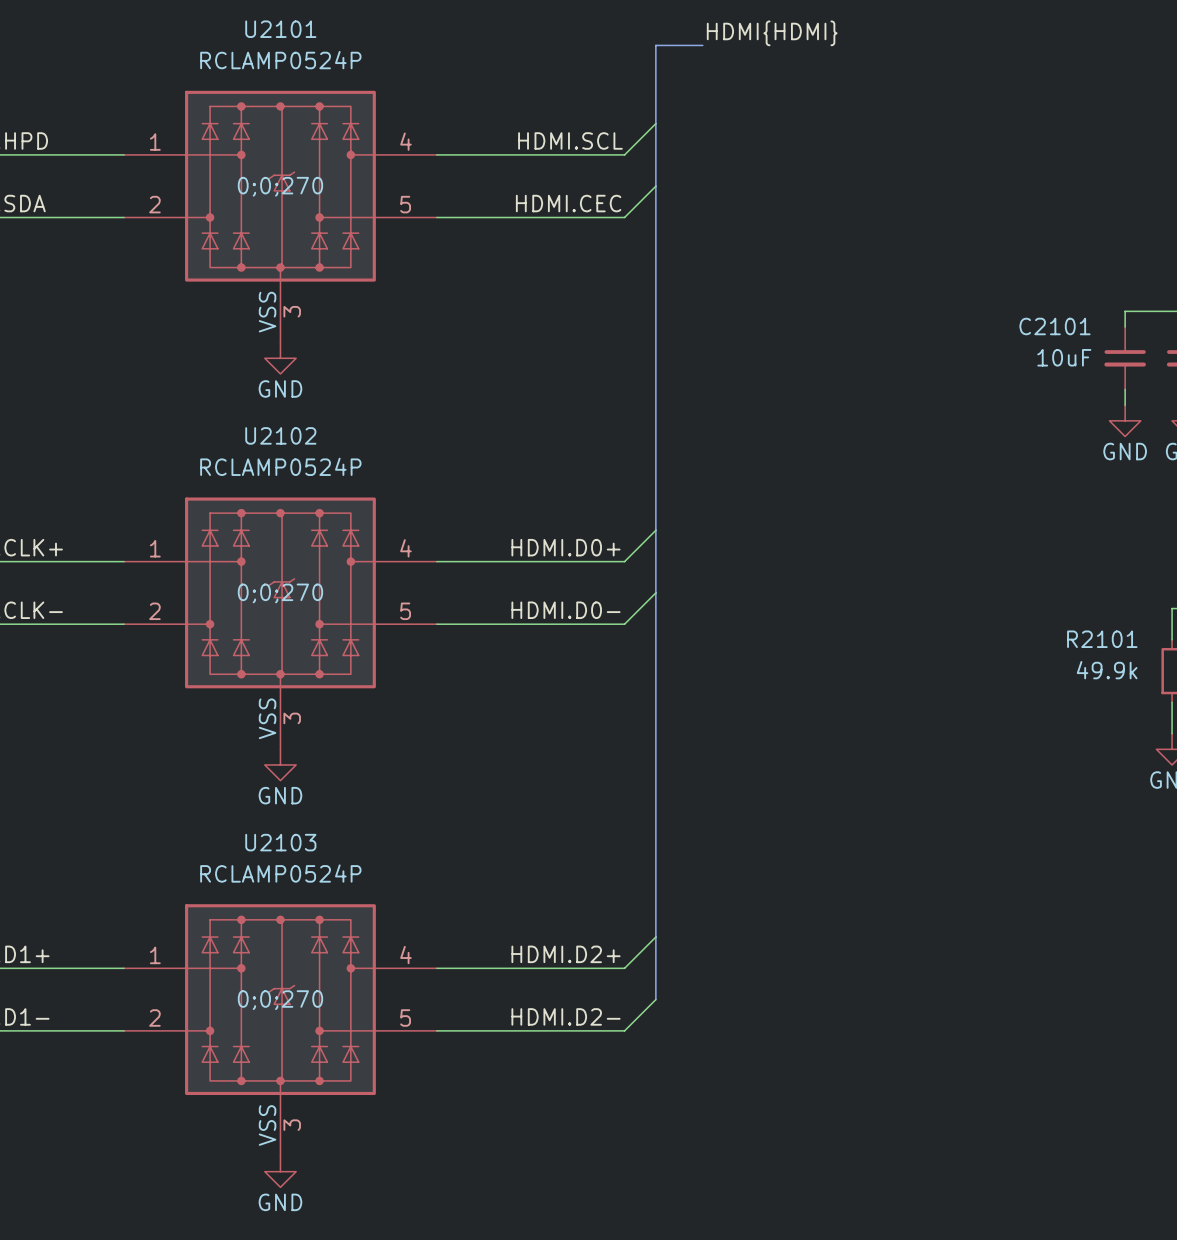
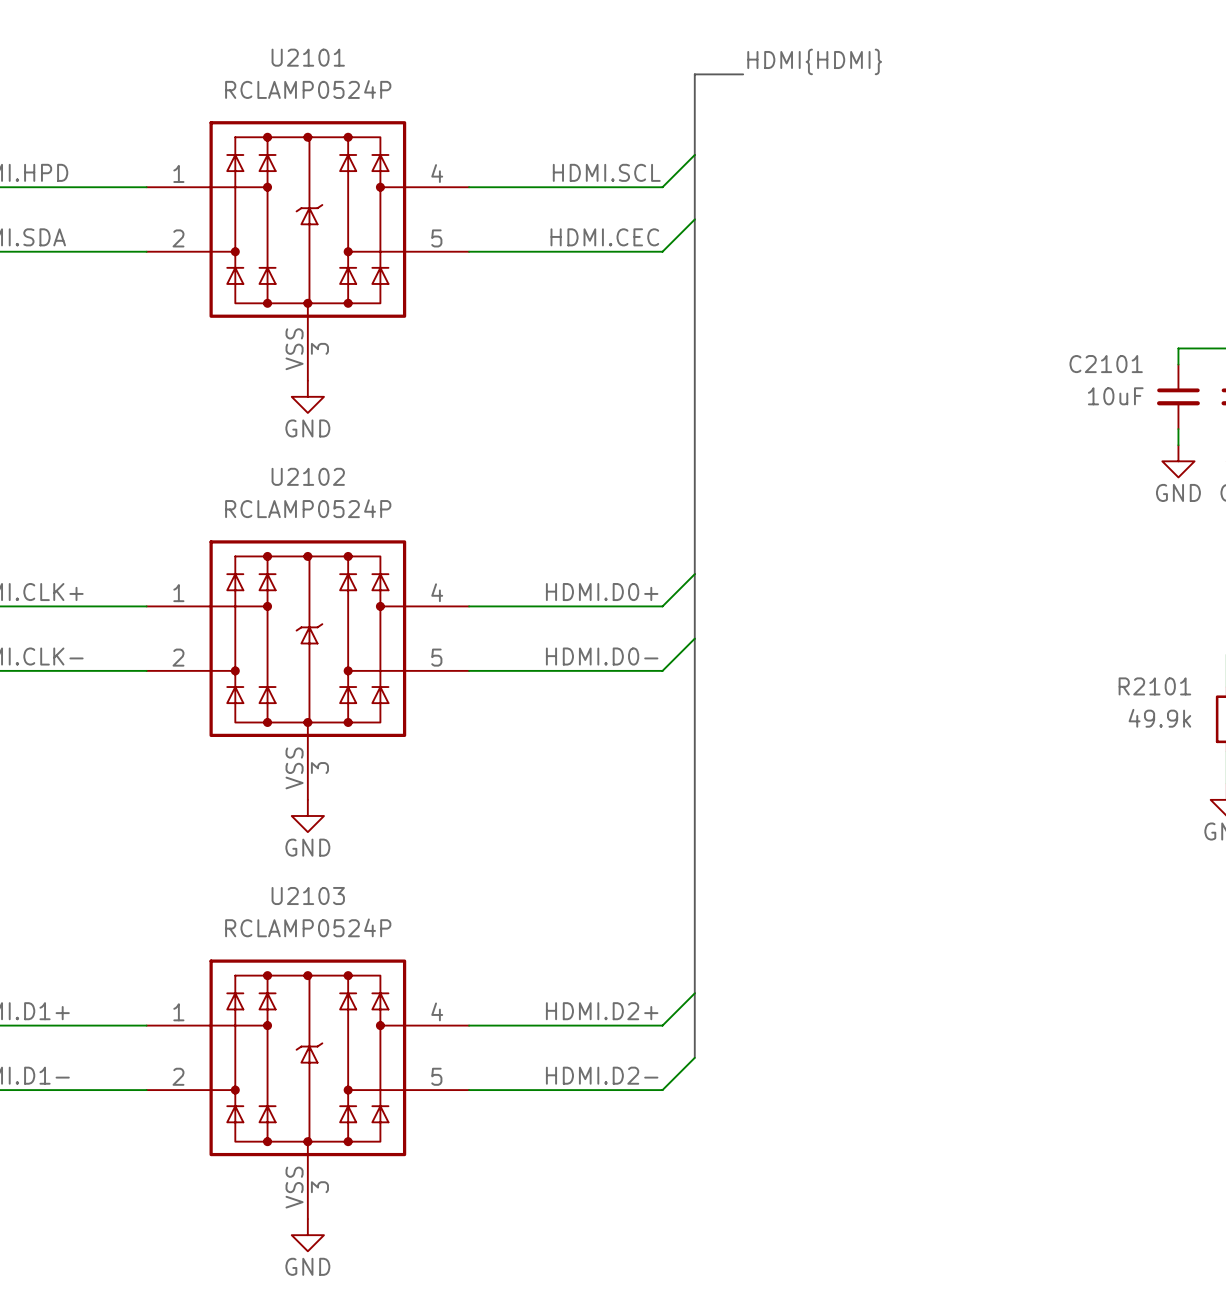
U2101 text: 0;0;270 (280, 186) -> none
U2102 text: 0;0;270 (280, 593) -> none
U2103 text: 0;0;270 (280, 1000) -> none

